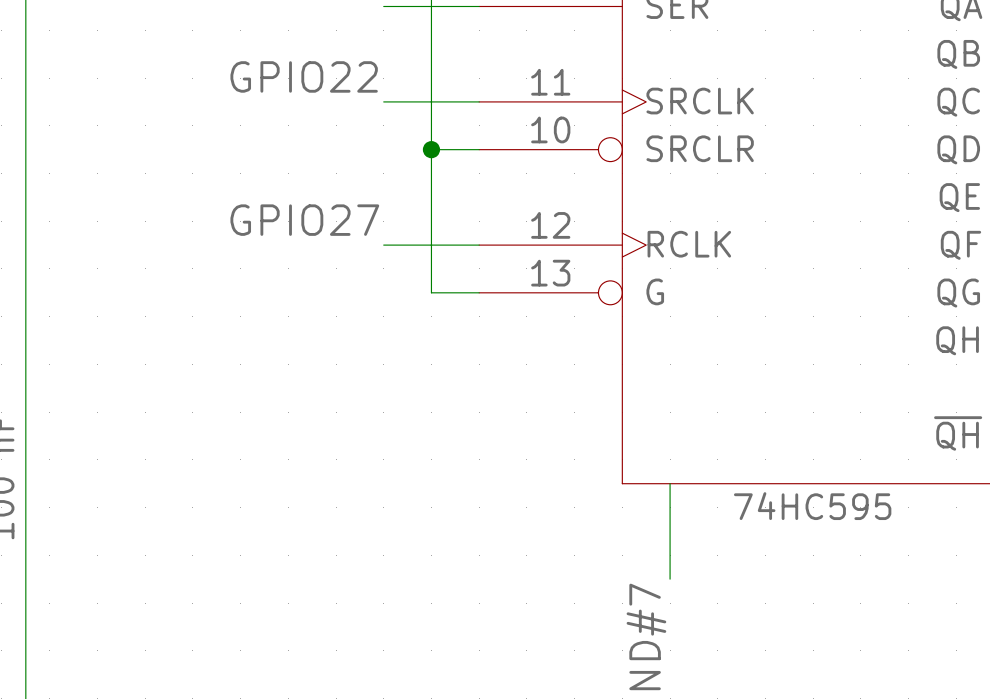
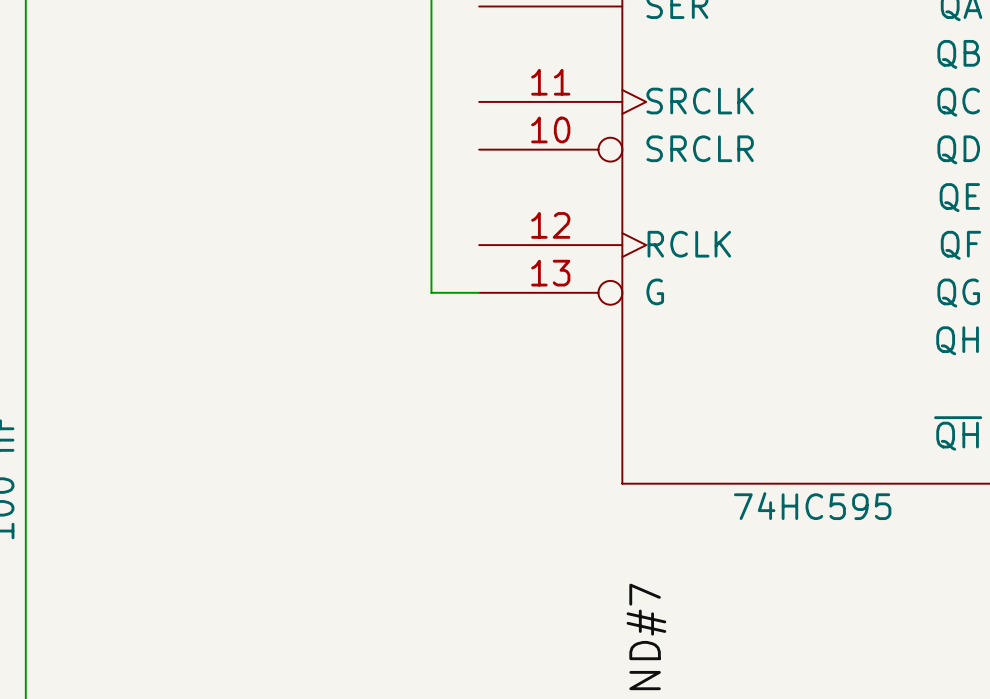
wire: (383, 6) (479, 6) -> none
label: GPIO22 (304, 76) -> none
wire: (383, 101) (479, 101) -> none
wire: (431, 149) (479, 149) -> none
junction: (431, 149) -> none
label: GPIO27 (304, 220) -> none
wire: (383, 245) (479, 245) -> none
wire: (670, 483) (670, 579) -> none

